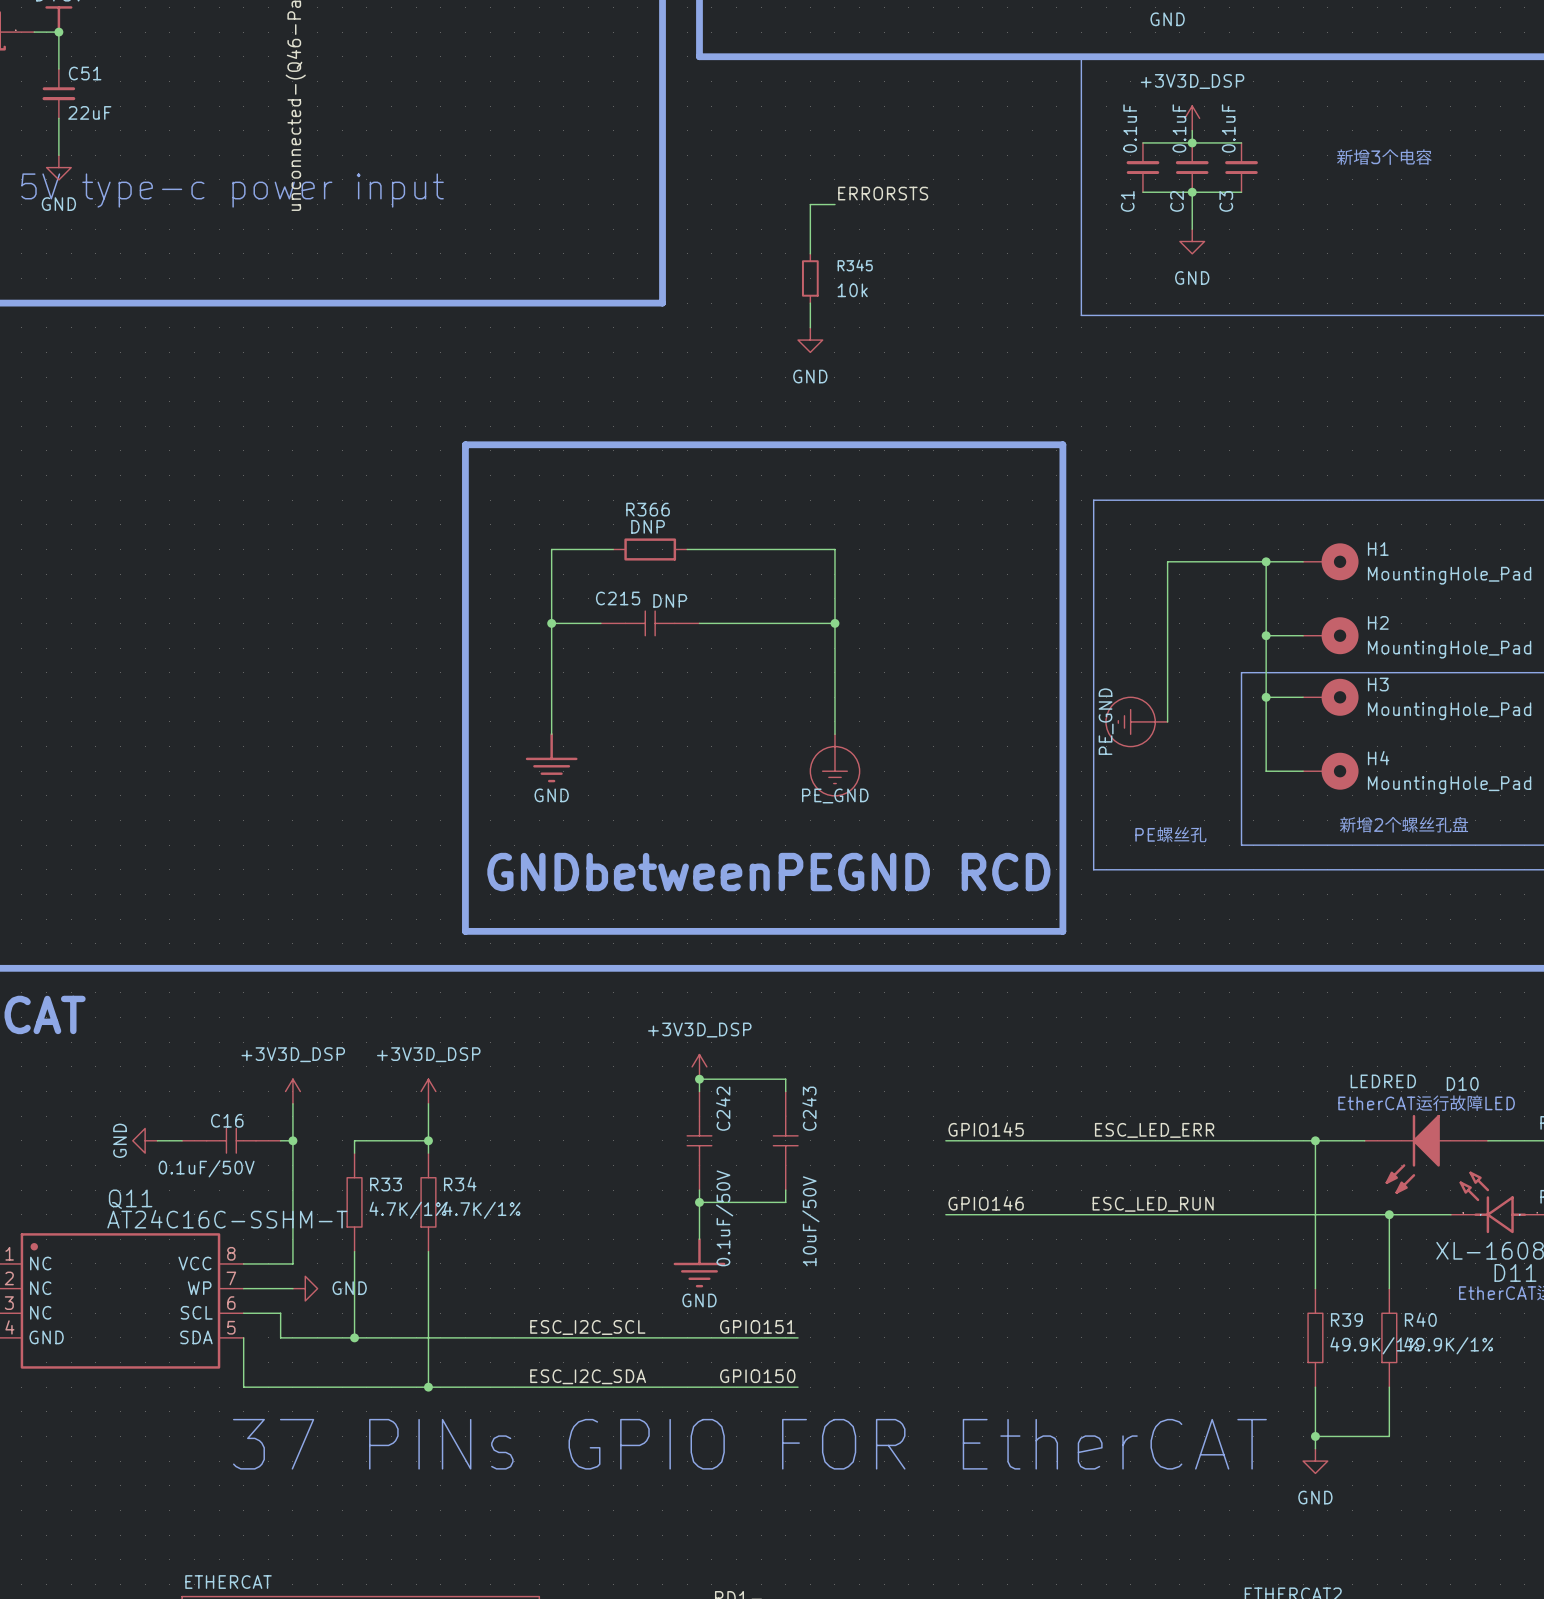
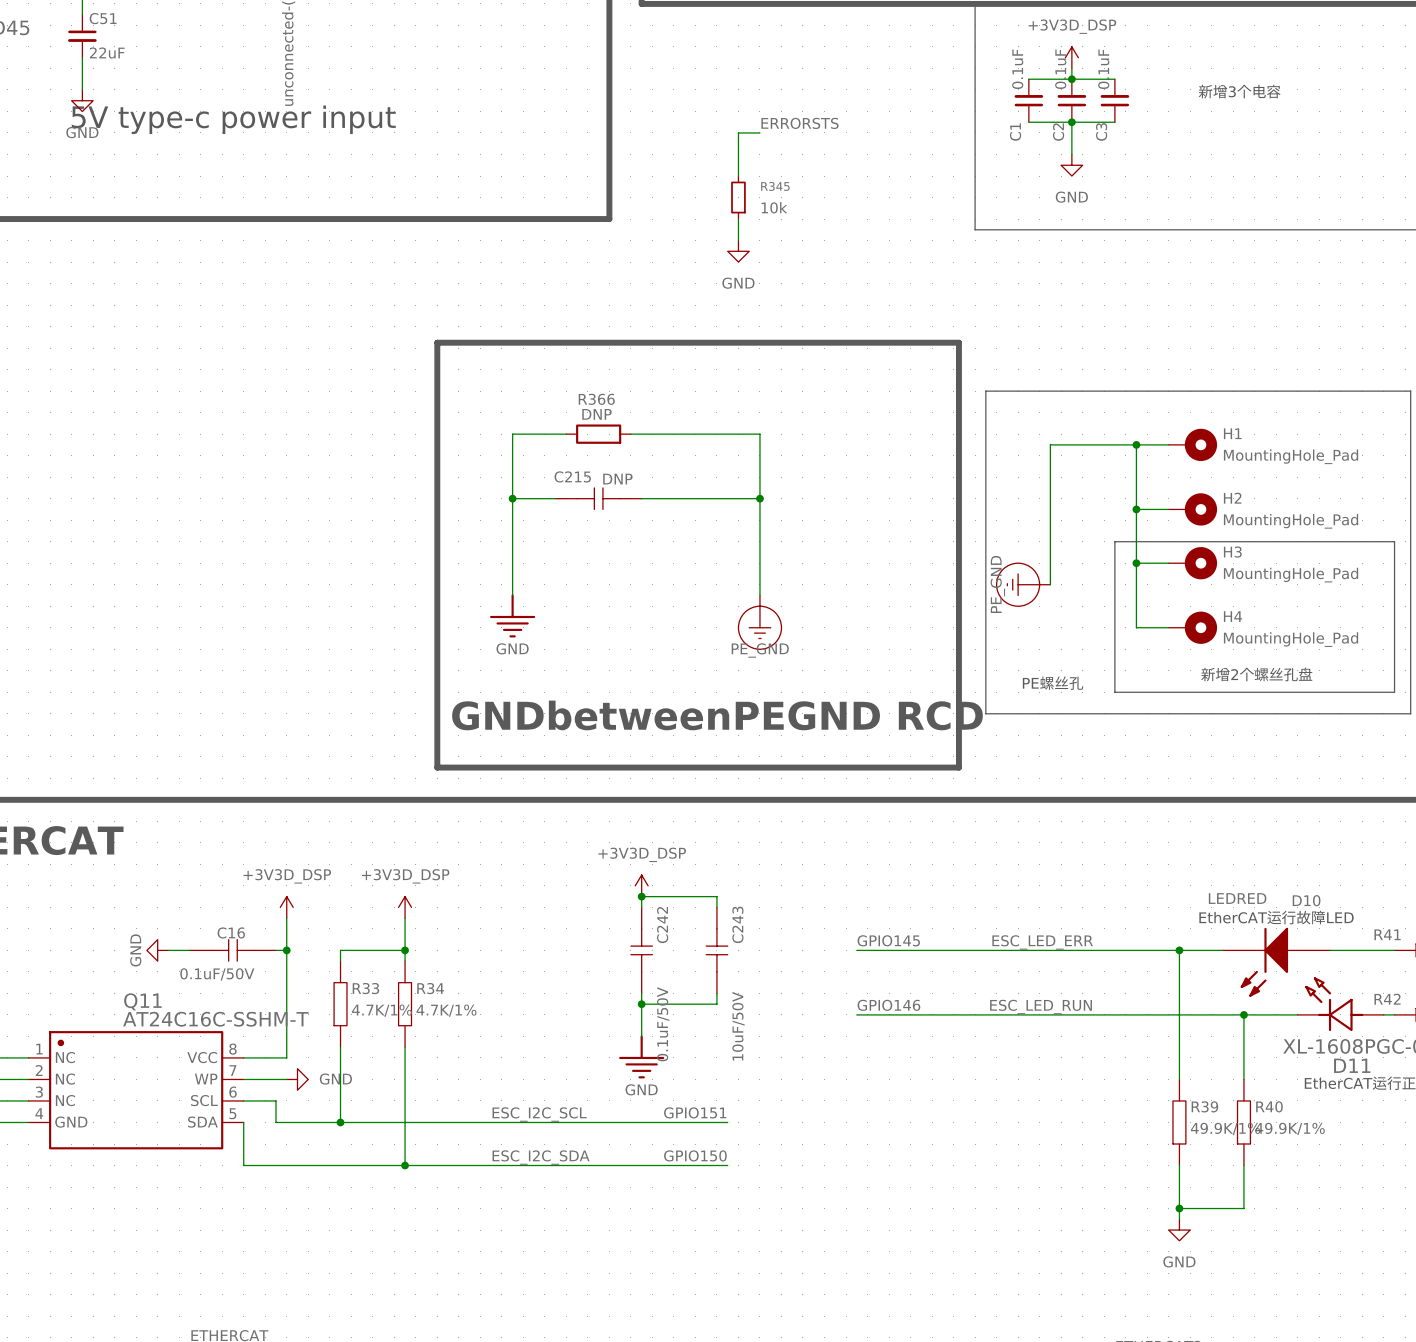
text: 37 PINs GPIO FOR EtherCAT (749, 1444) -> none

